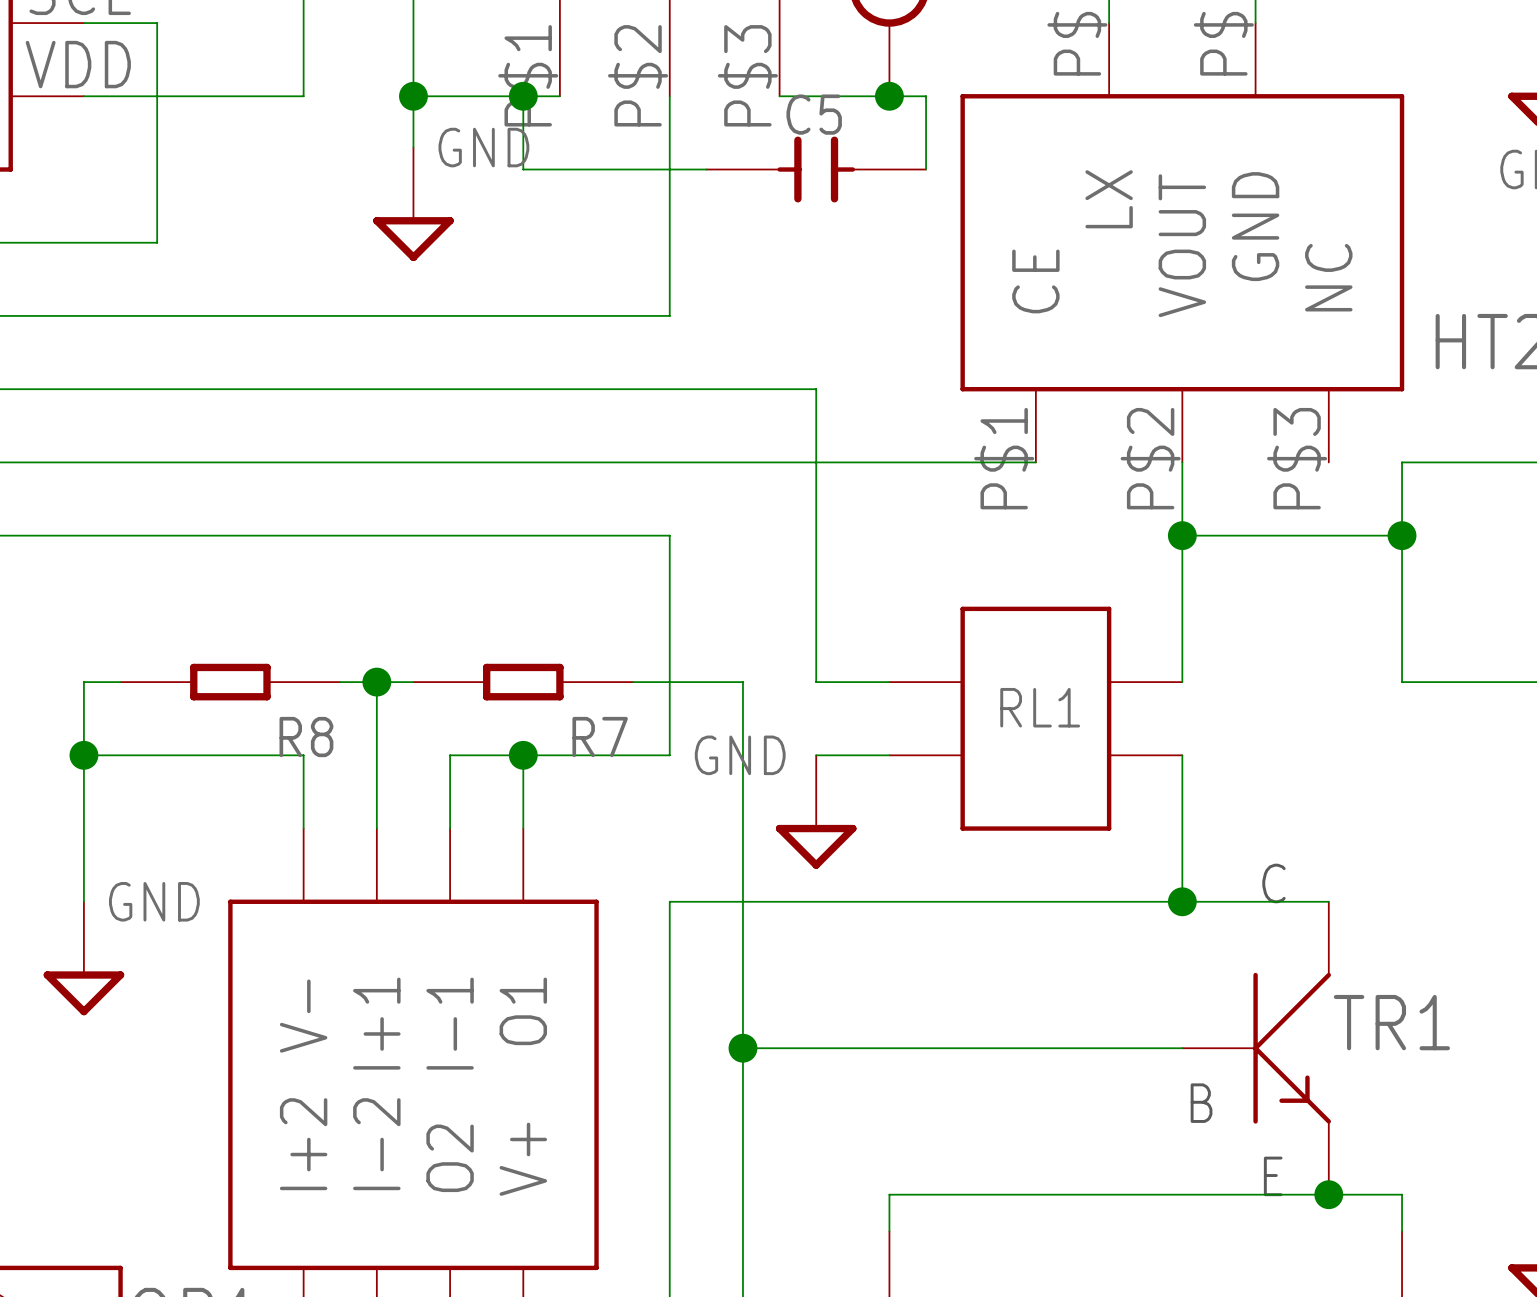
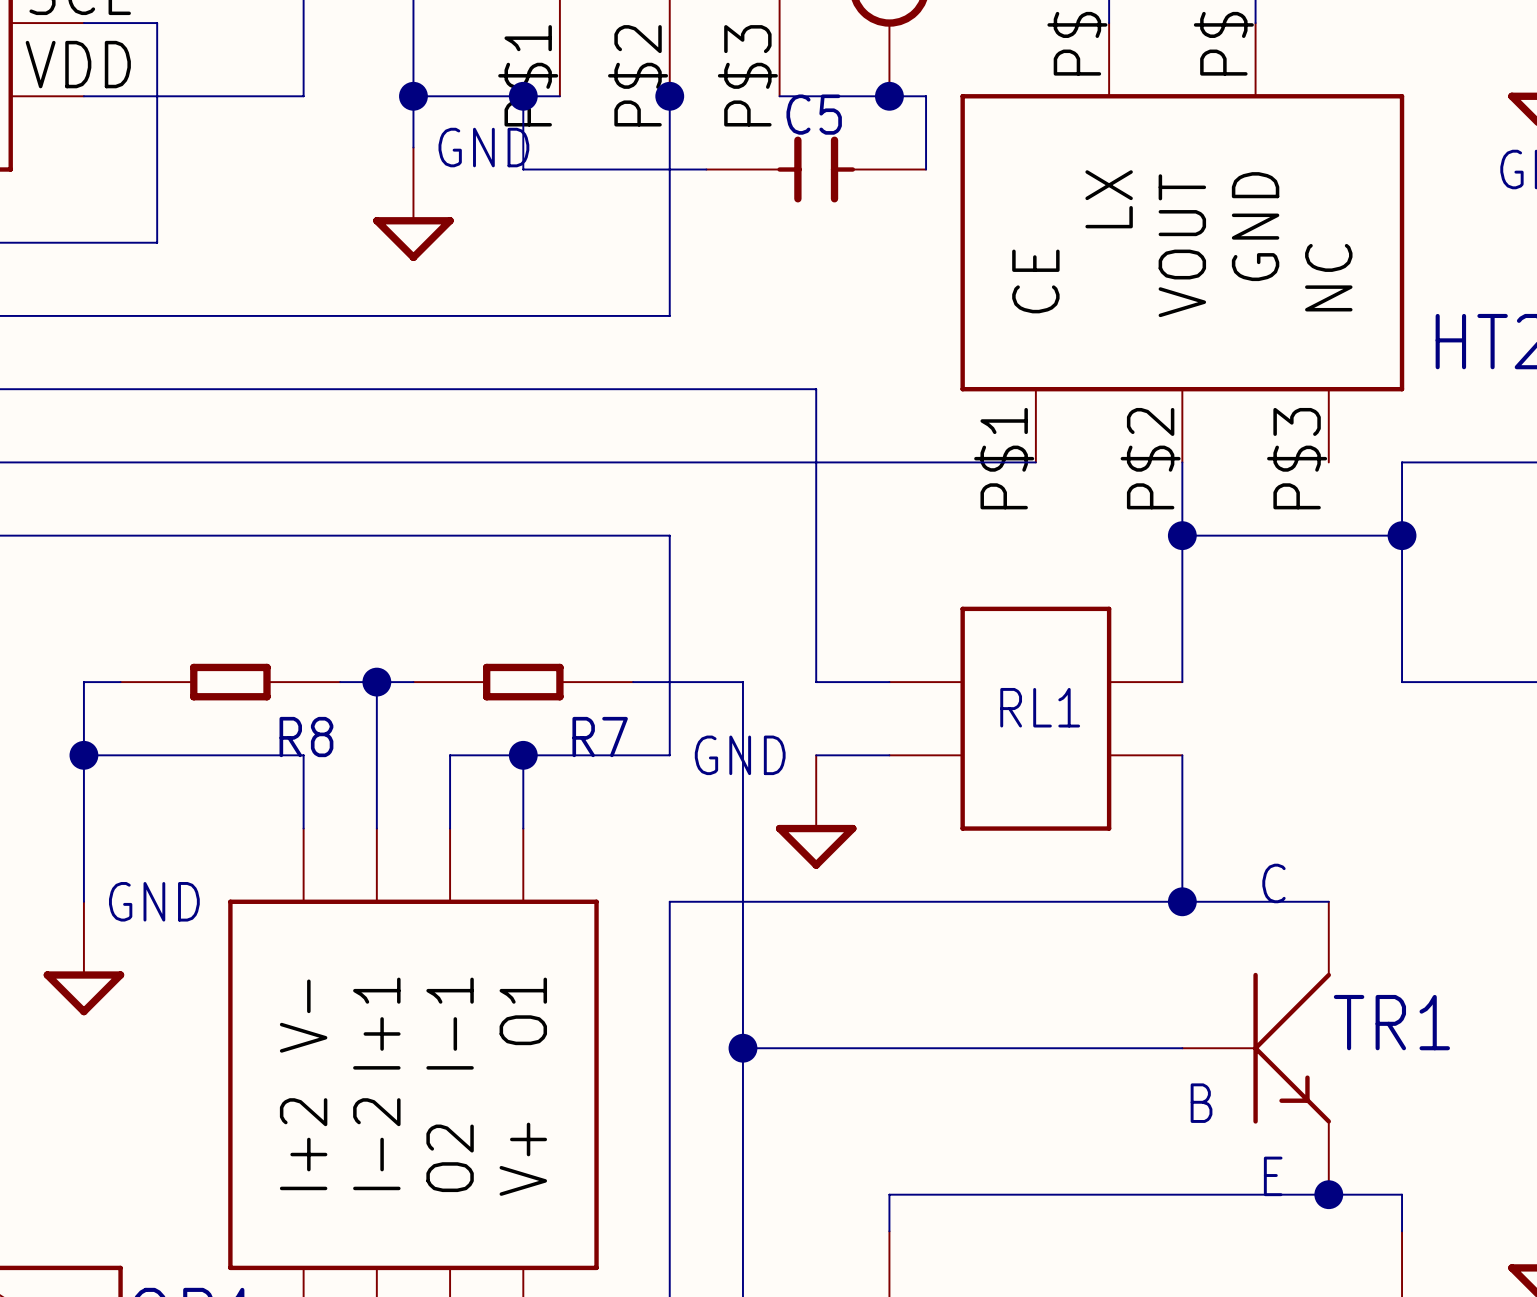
junction: none -> (669, 96)

